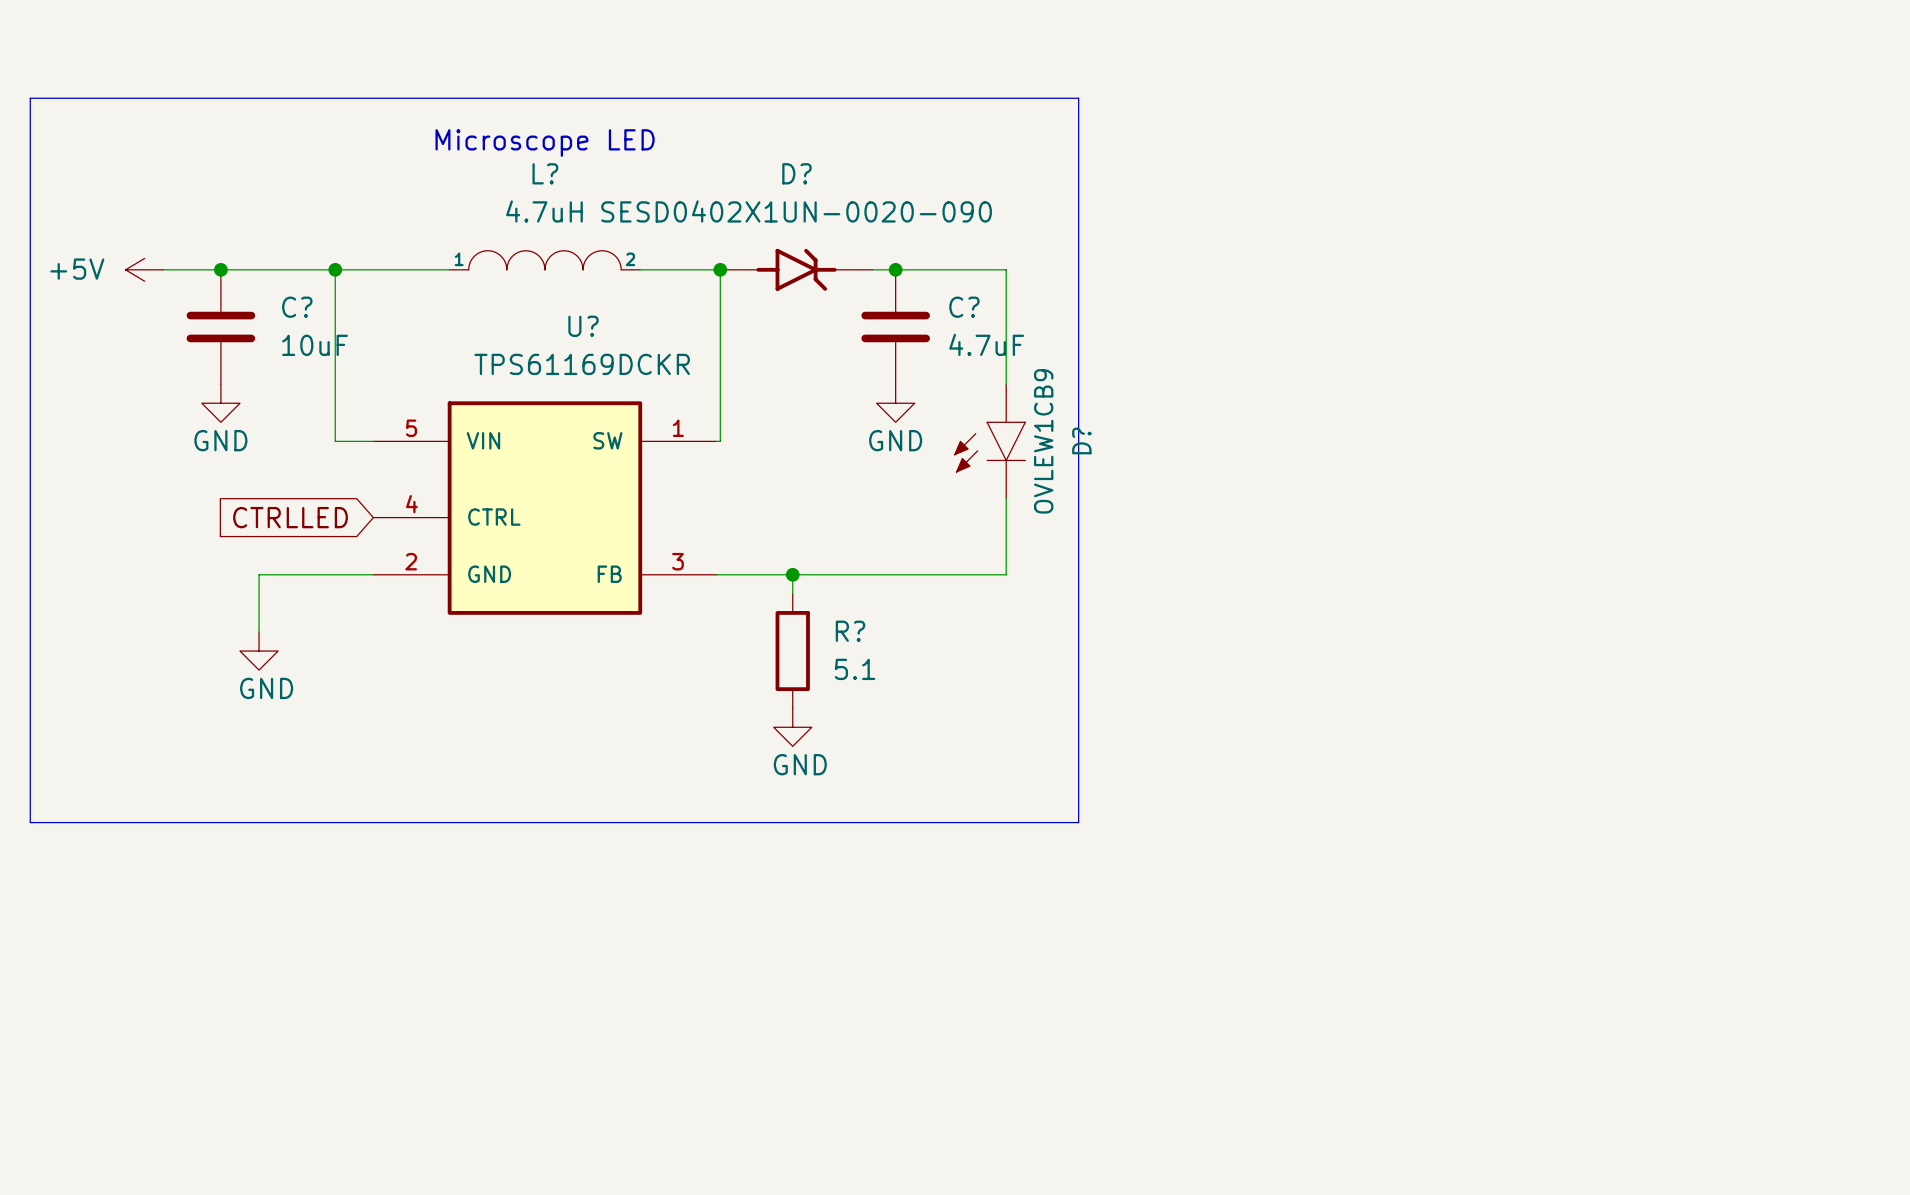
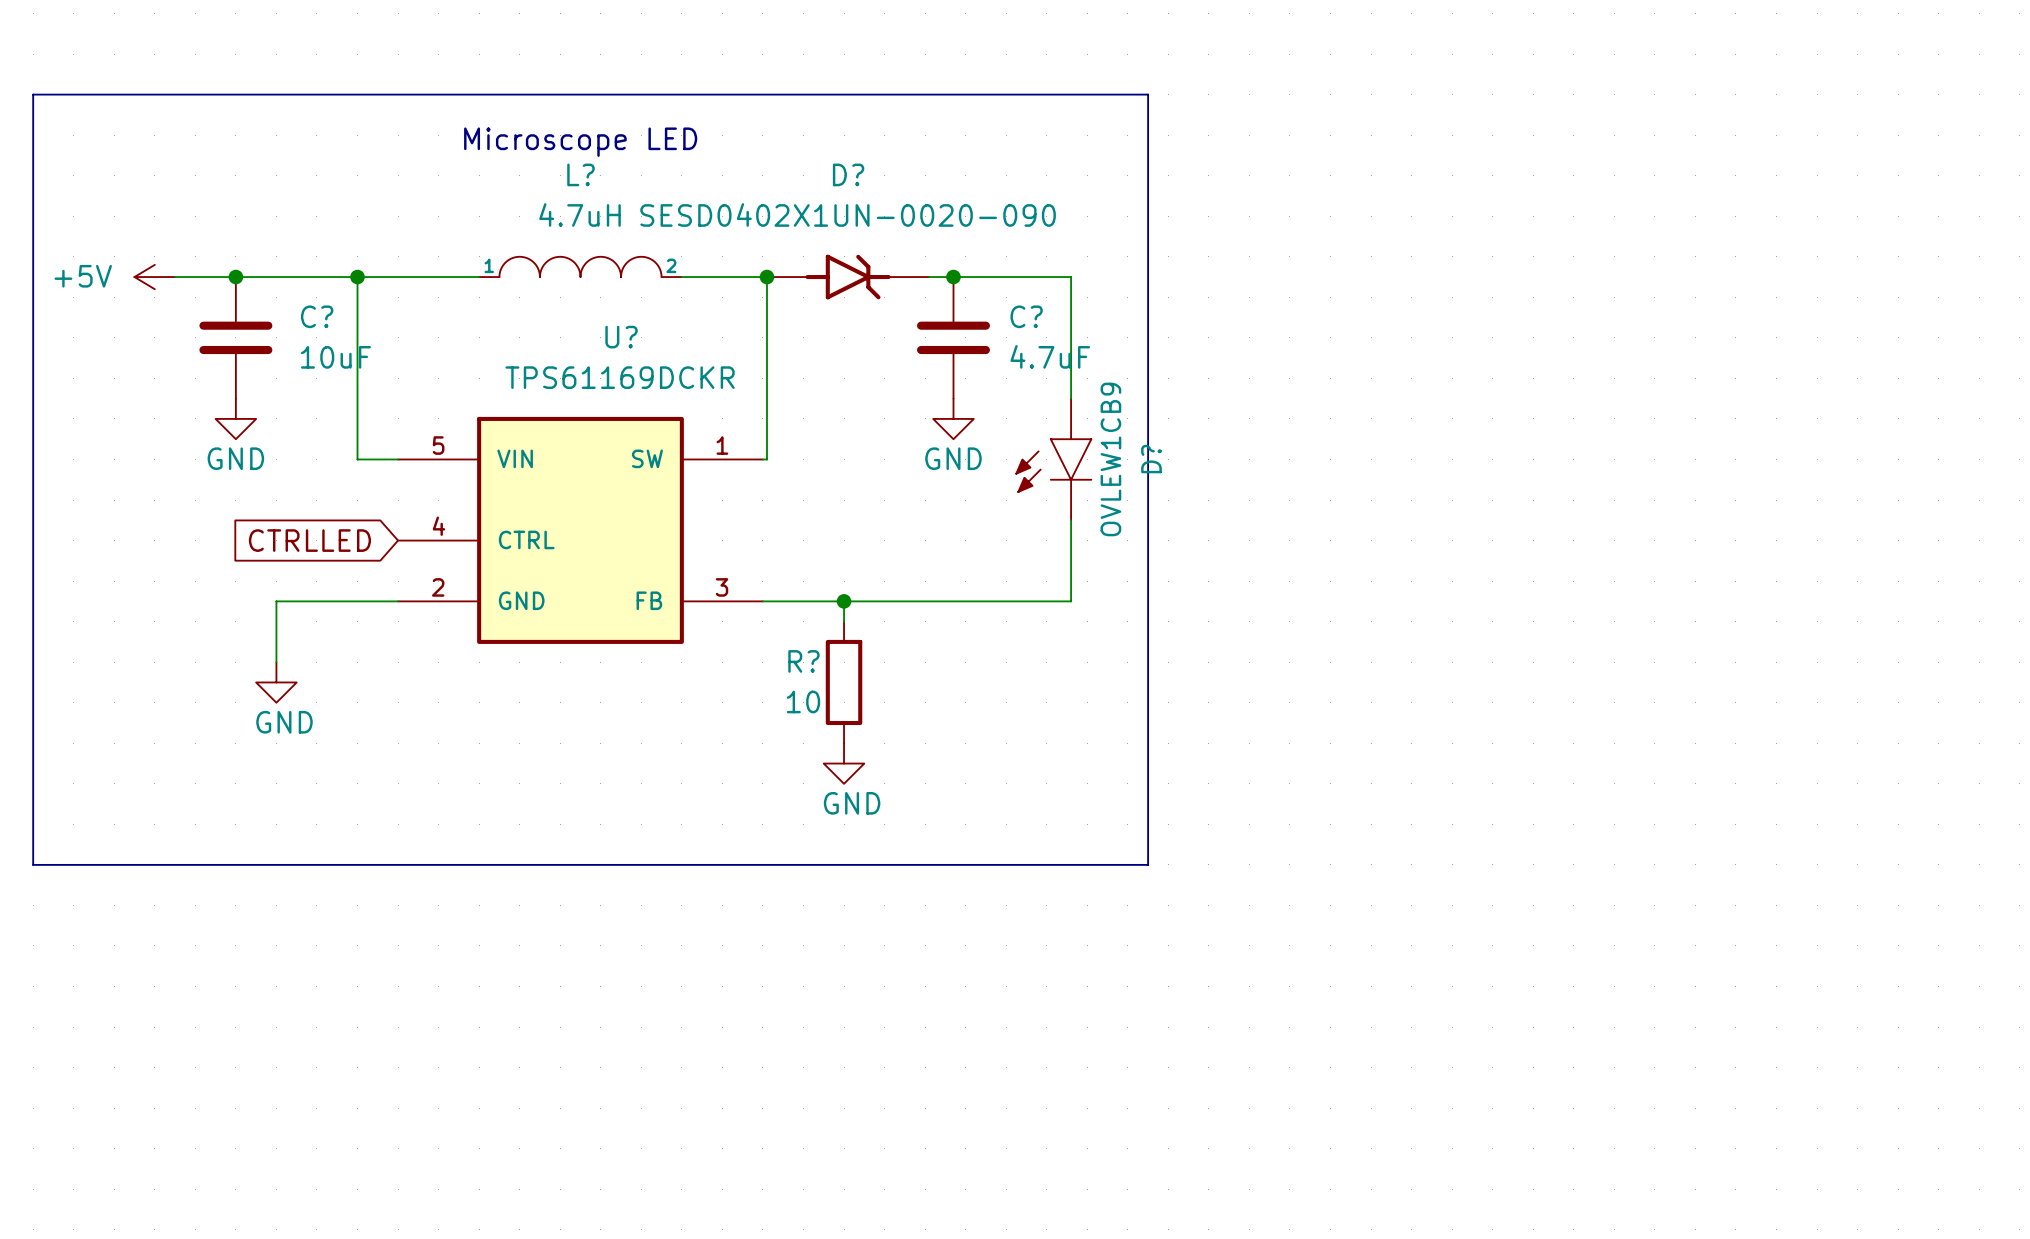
R? name position: R? (850, 631) -> R? (803, 661)
R? value: 5.1 (855, 669) -> 10 (803, 701)

